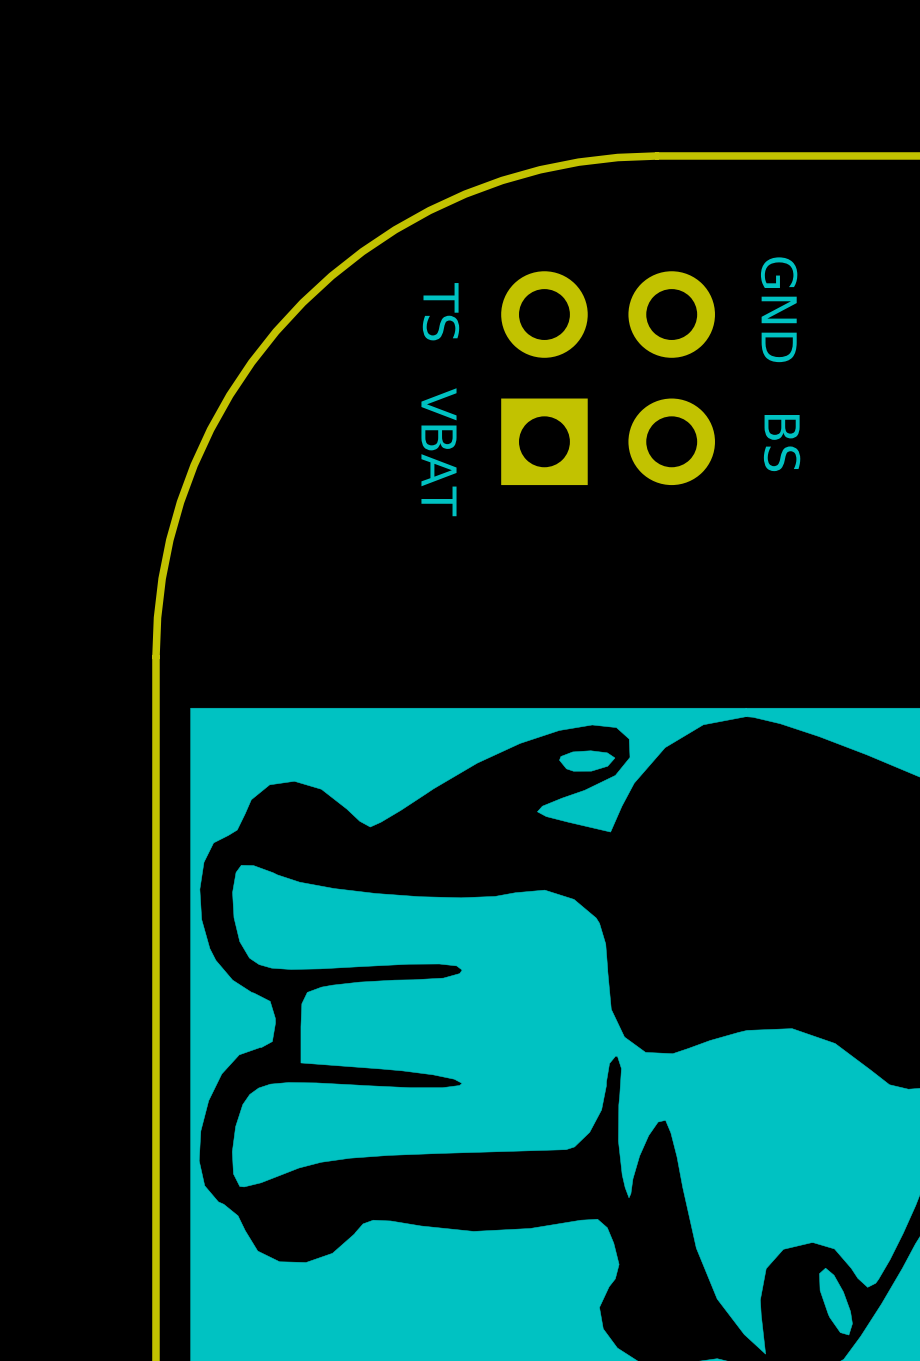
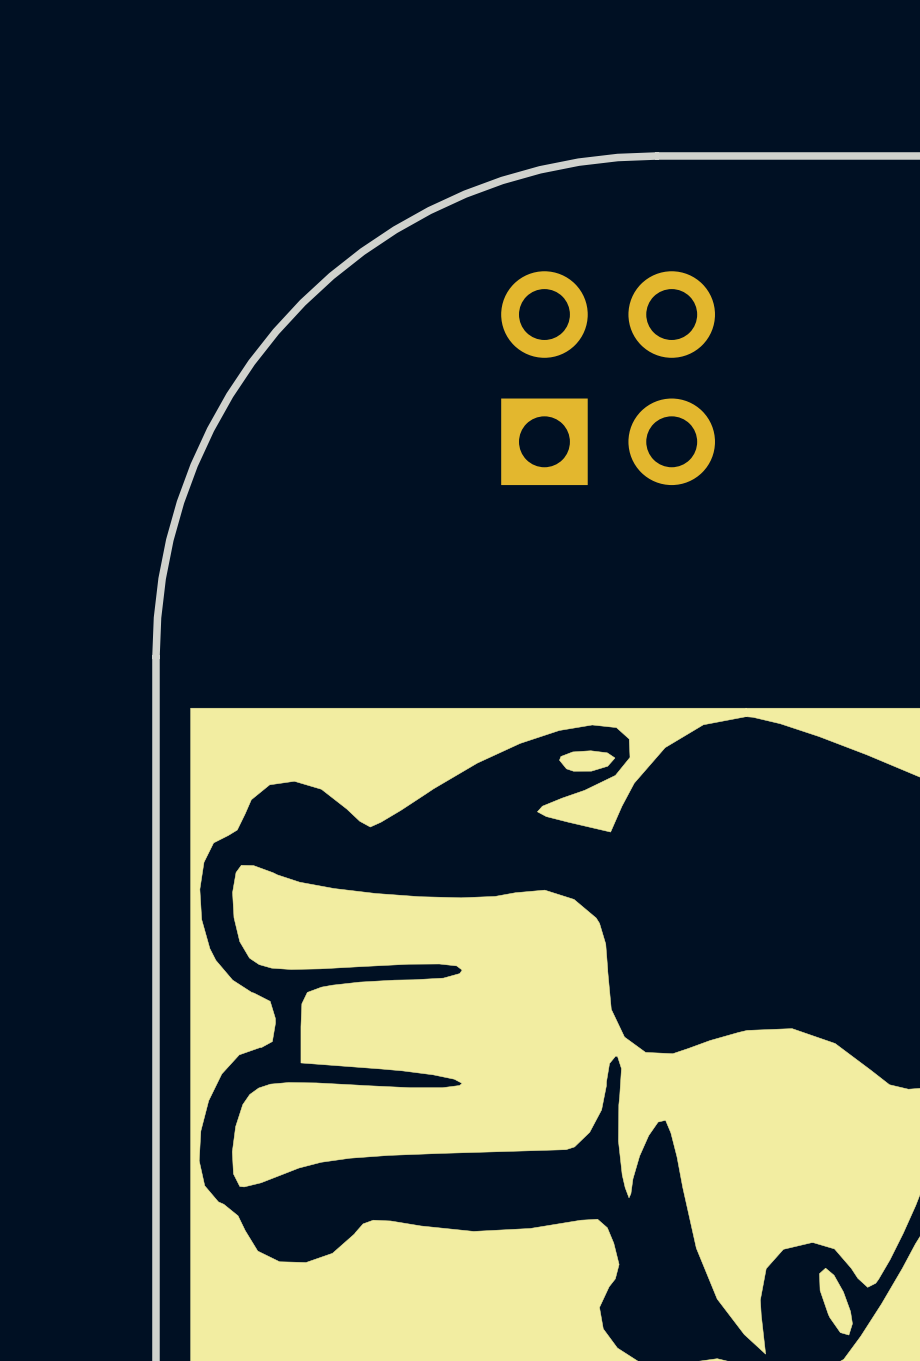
text: GND (779, 309) -> none
text: TS (441, 311) -> none
text: BS (782, 443) -> none
text: VBAT (438, 452) -> none

